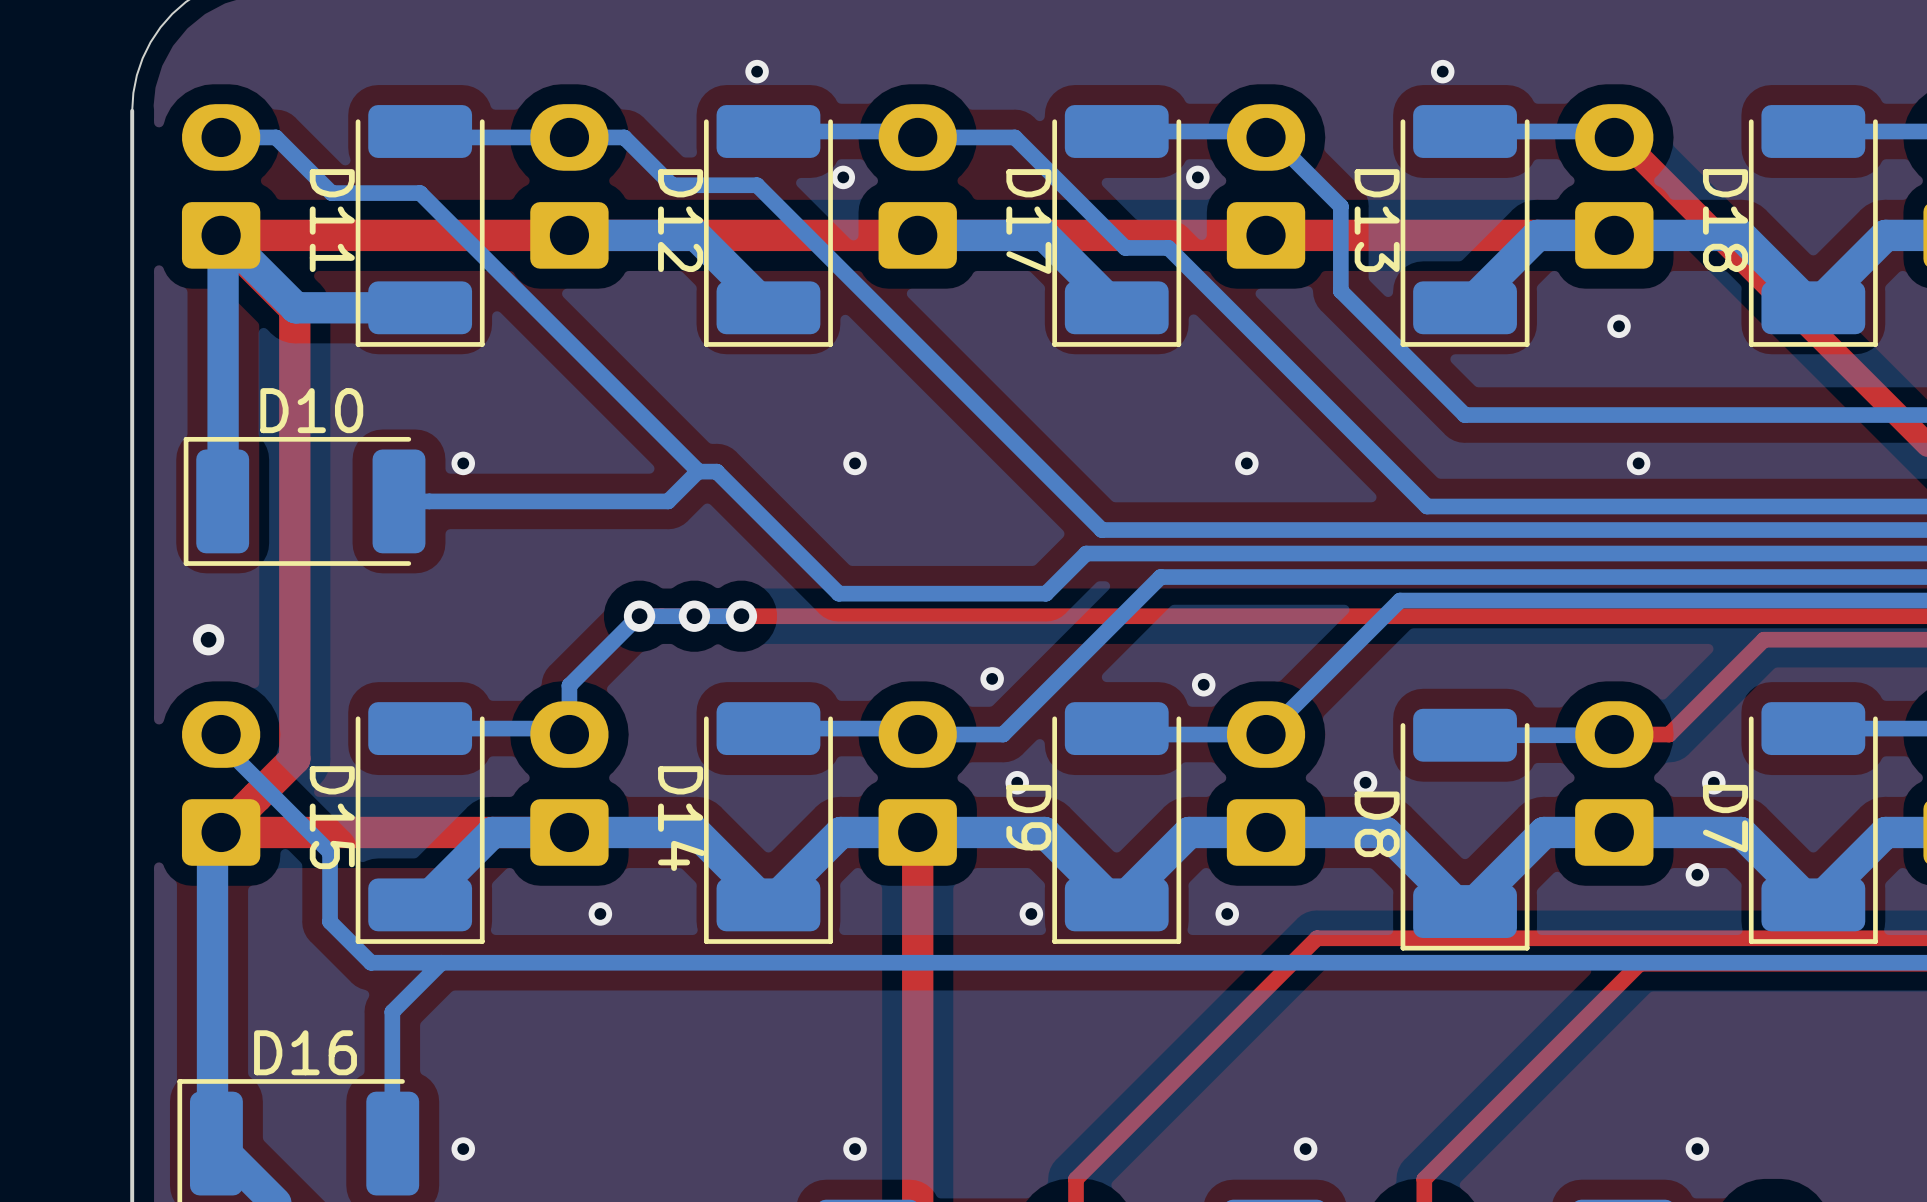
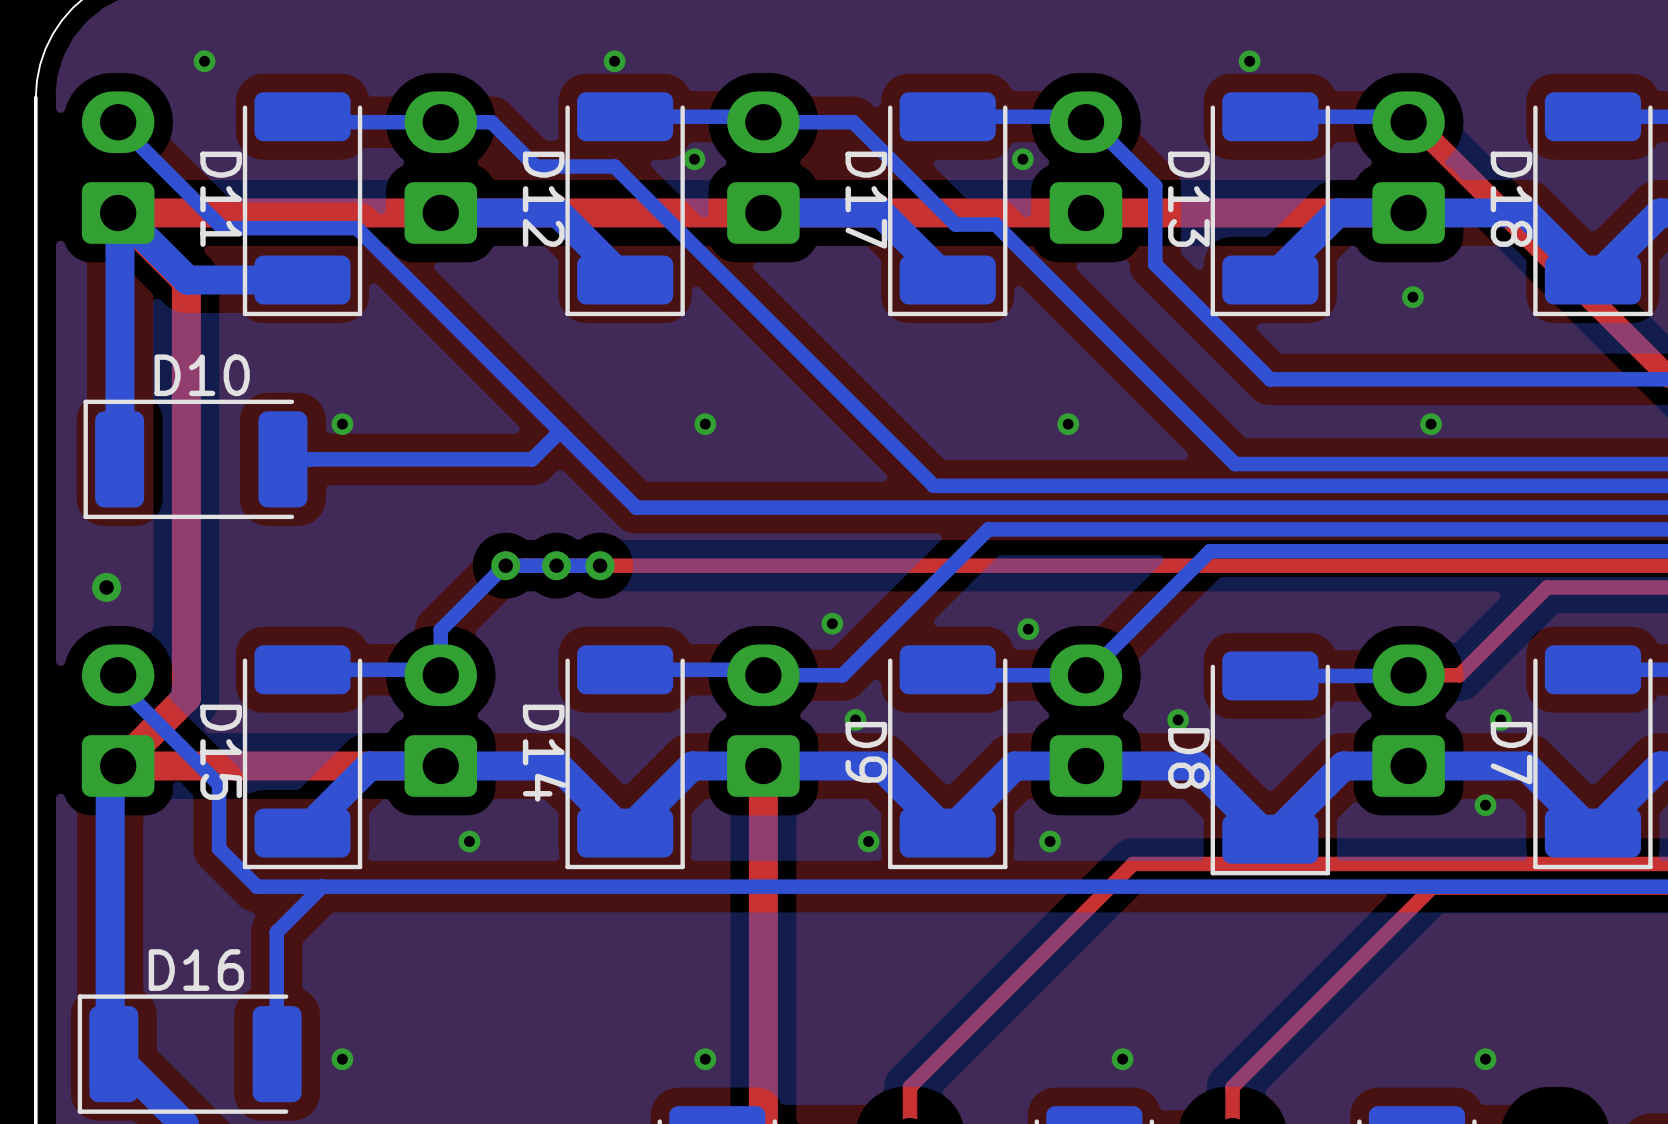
via: none -> (204, 61)
bottom track: (221, 137) (275, 137) (331, 193) (420, 193) (478, 251) -> (118, 122) (222, 228) (356, 228)
bottom track: (698, 471) (716, 471) (838, 593) (1046, 593) (1086, 553) -> (560, 431) (636, 507) (919, 507)

